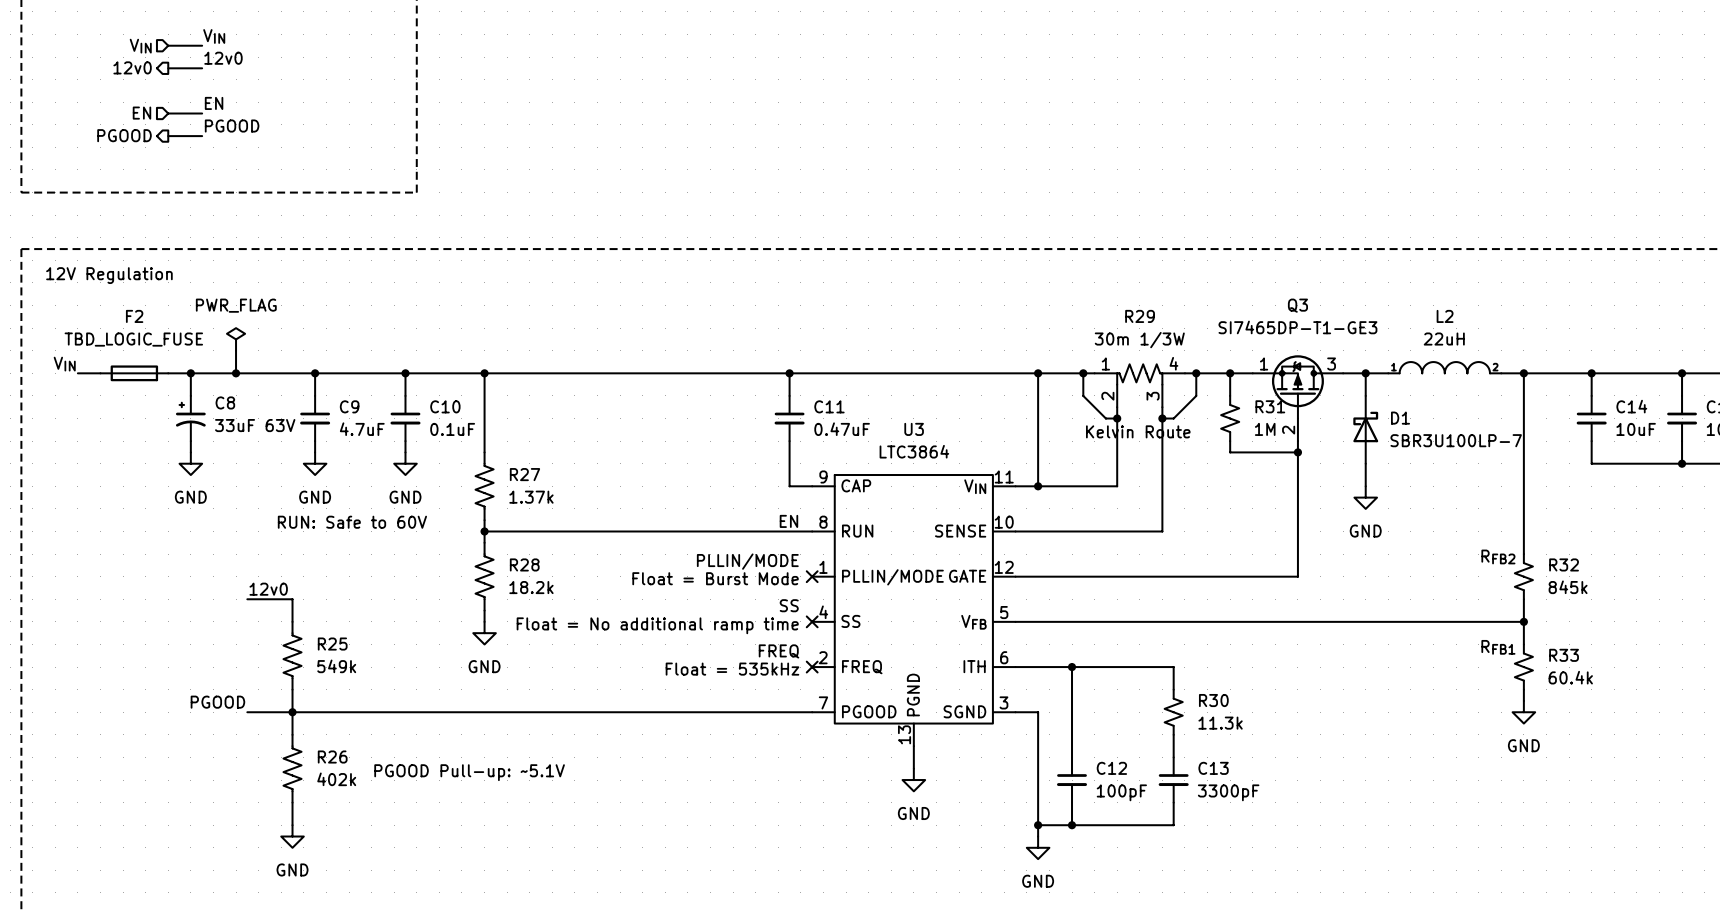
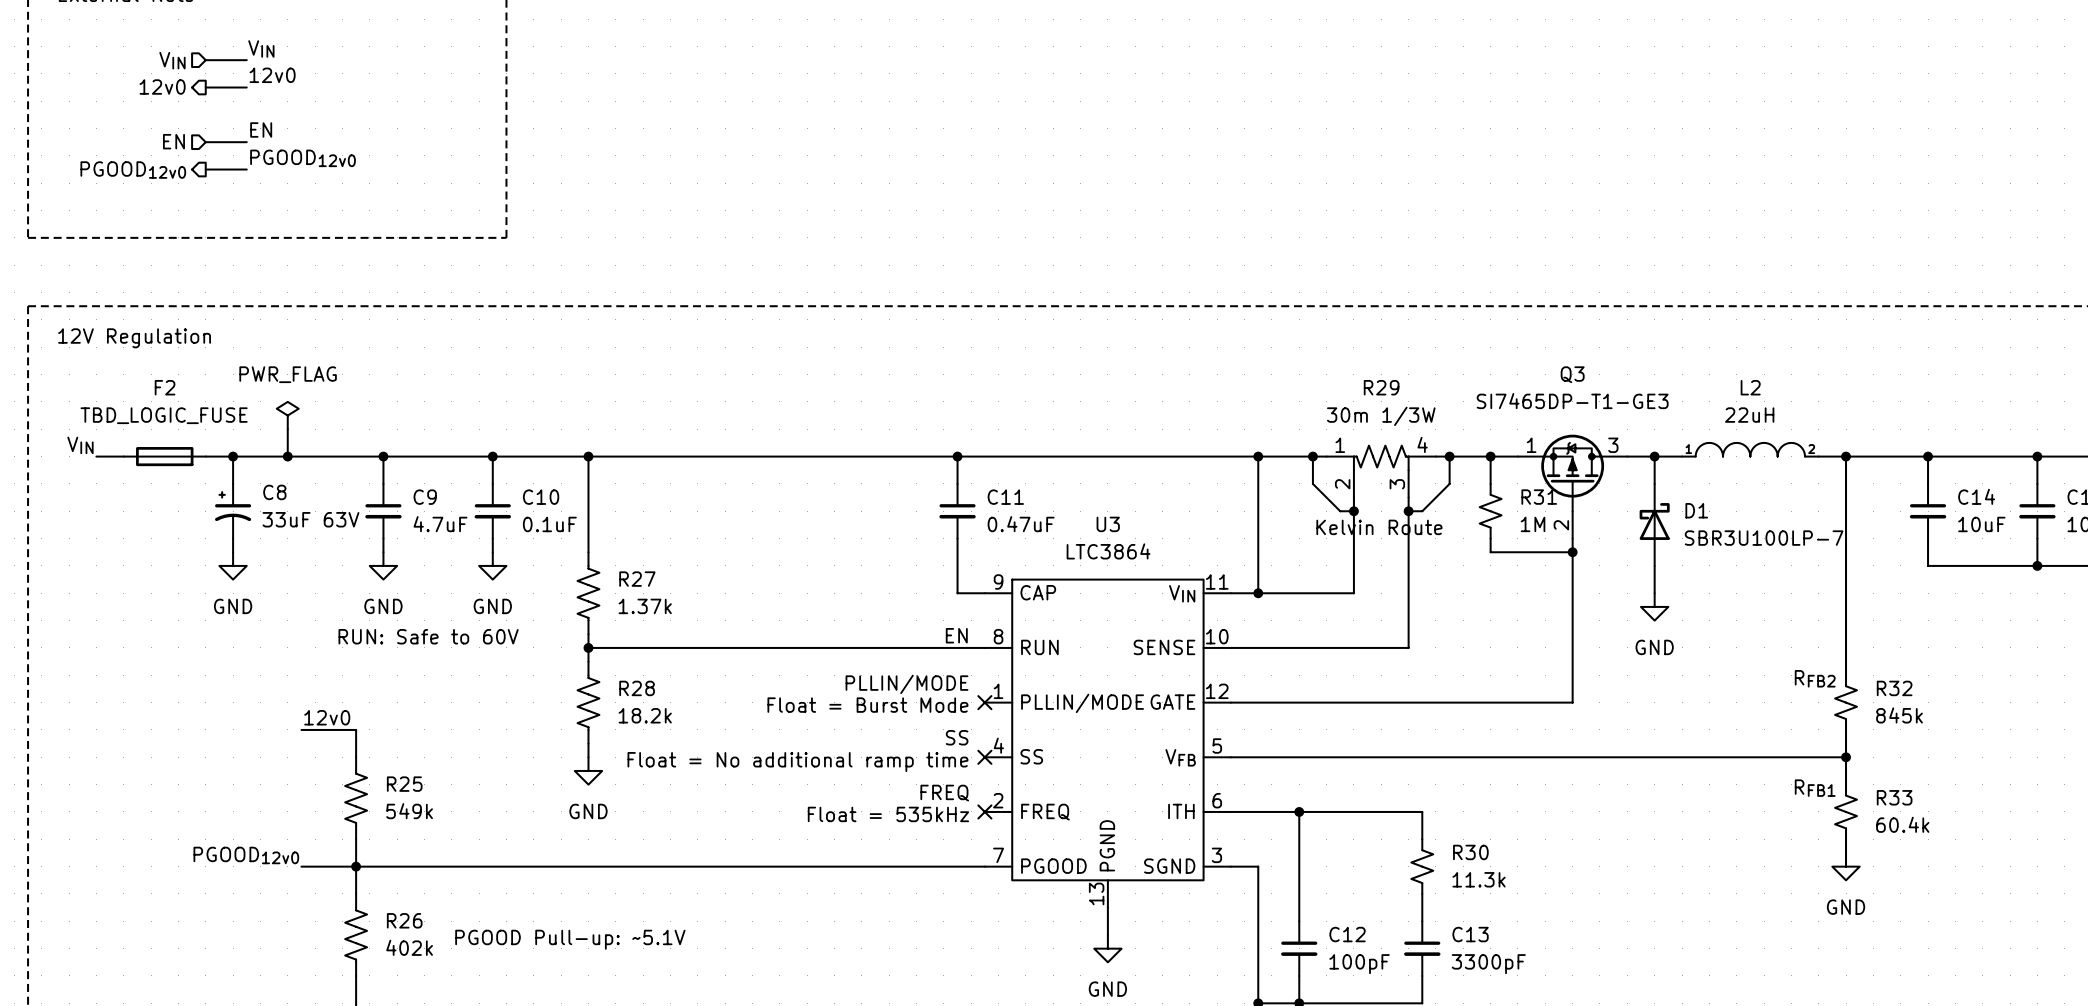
label: PGOOD (232, 126) -> PGOOD12v0 (303, 158)
hierarchical label: PGOOD (124, 135) -> PGOOD12v0 (133, 170)
label: PGOOD (217, 702) -> PGOOD12v0 (246, 855)

